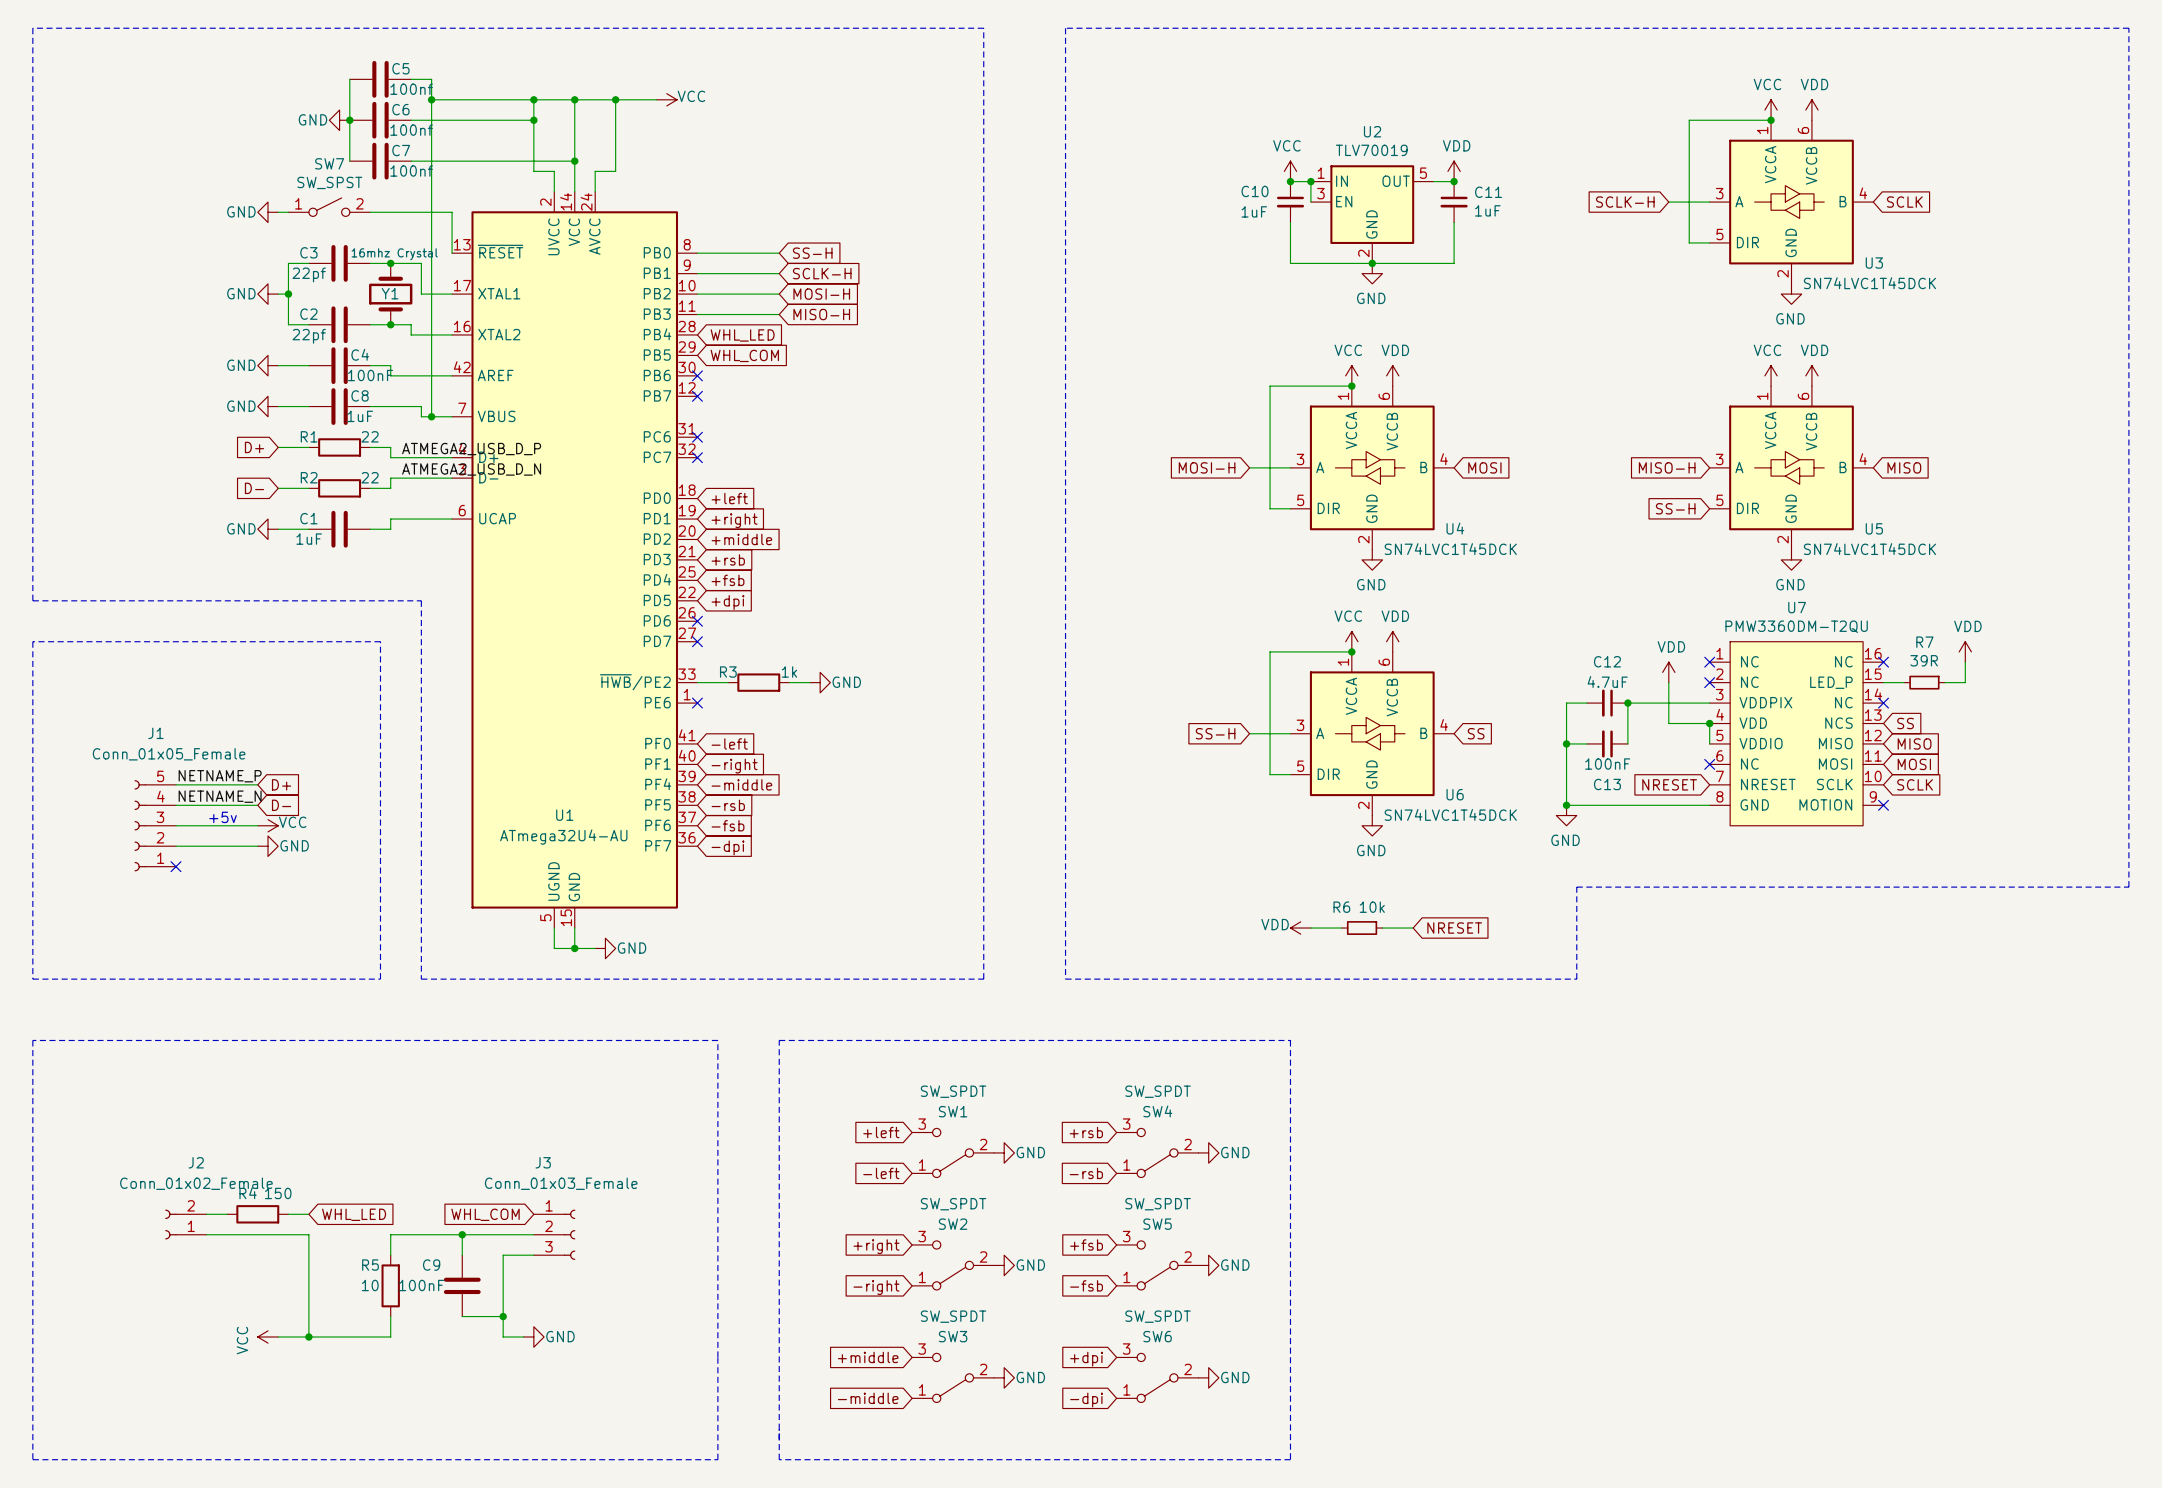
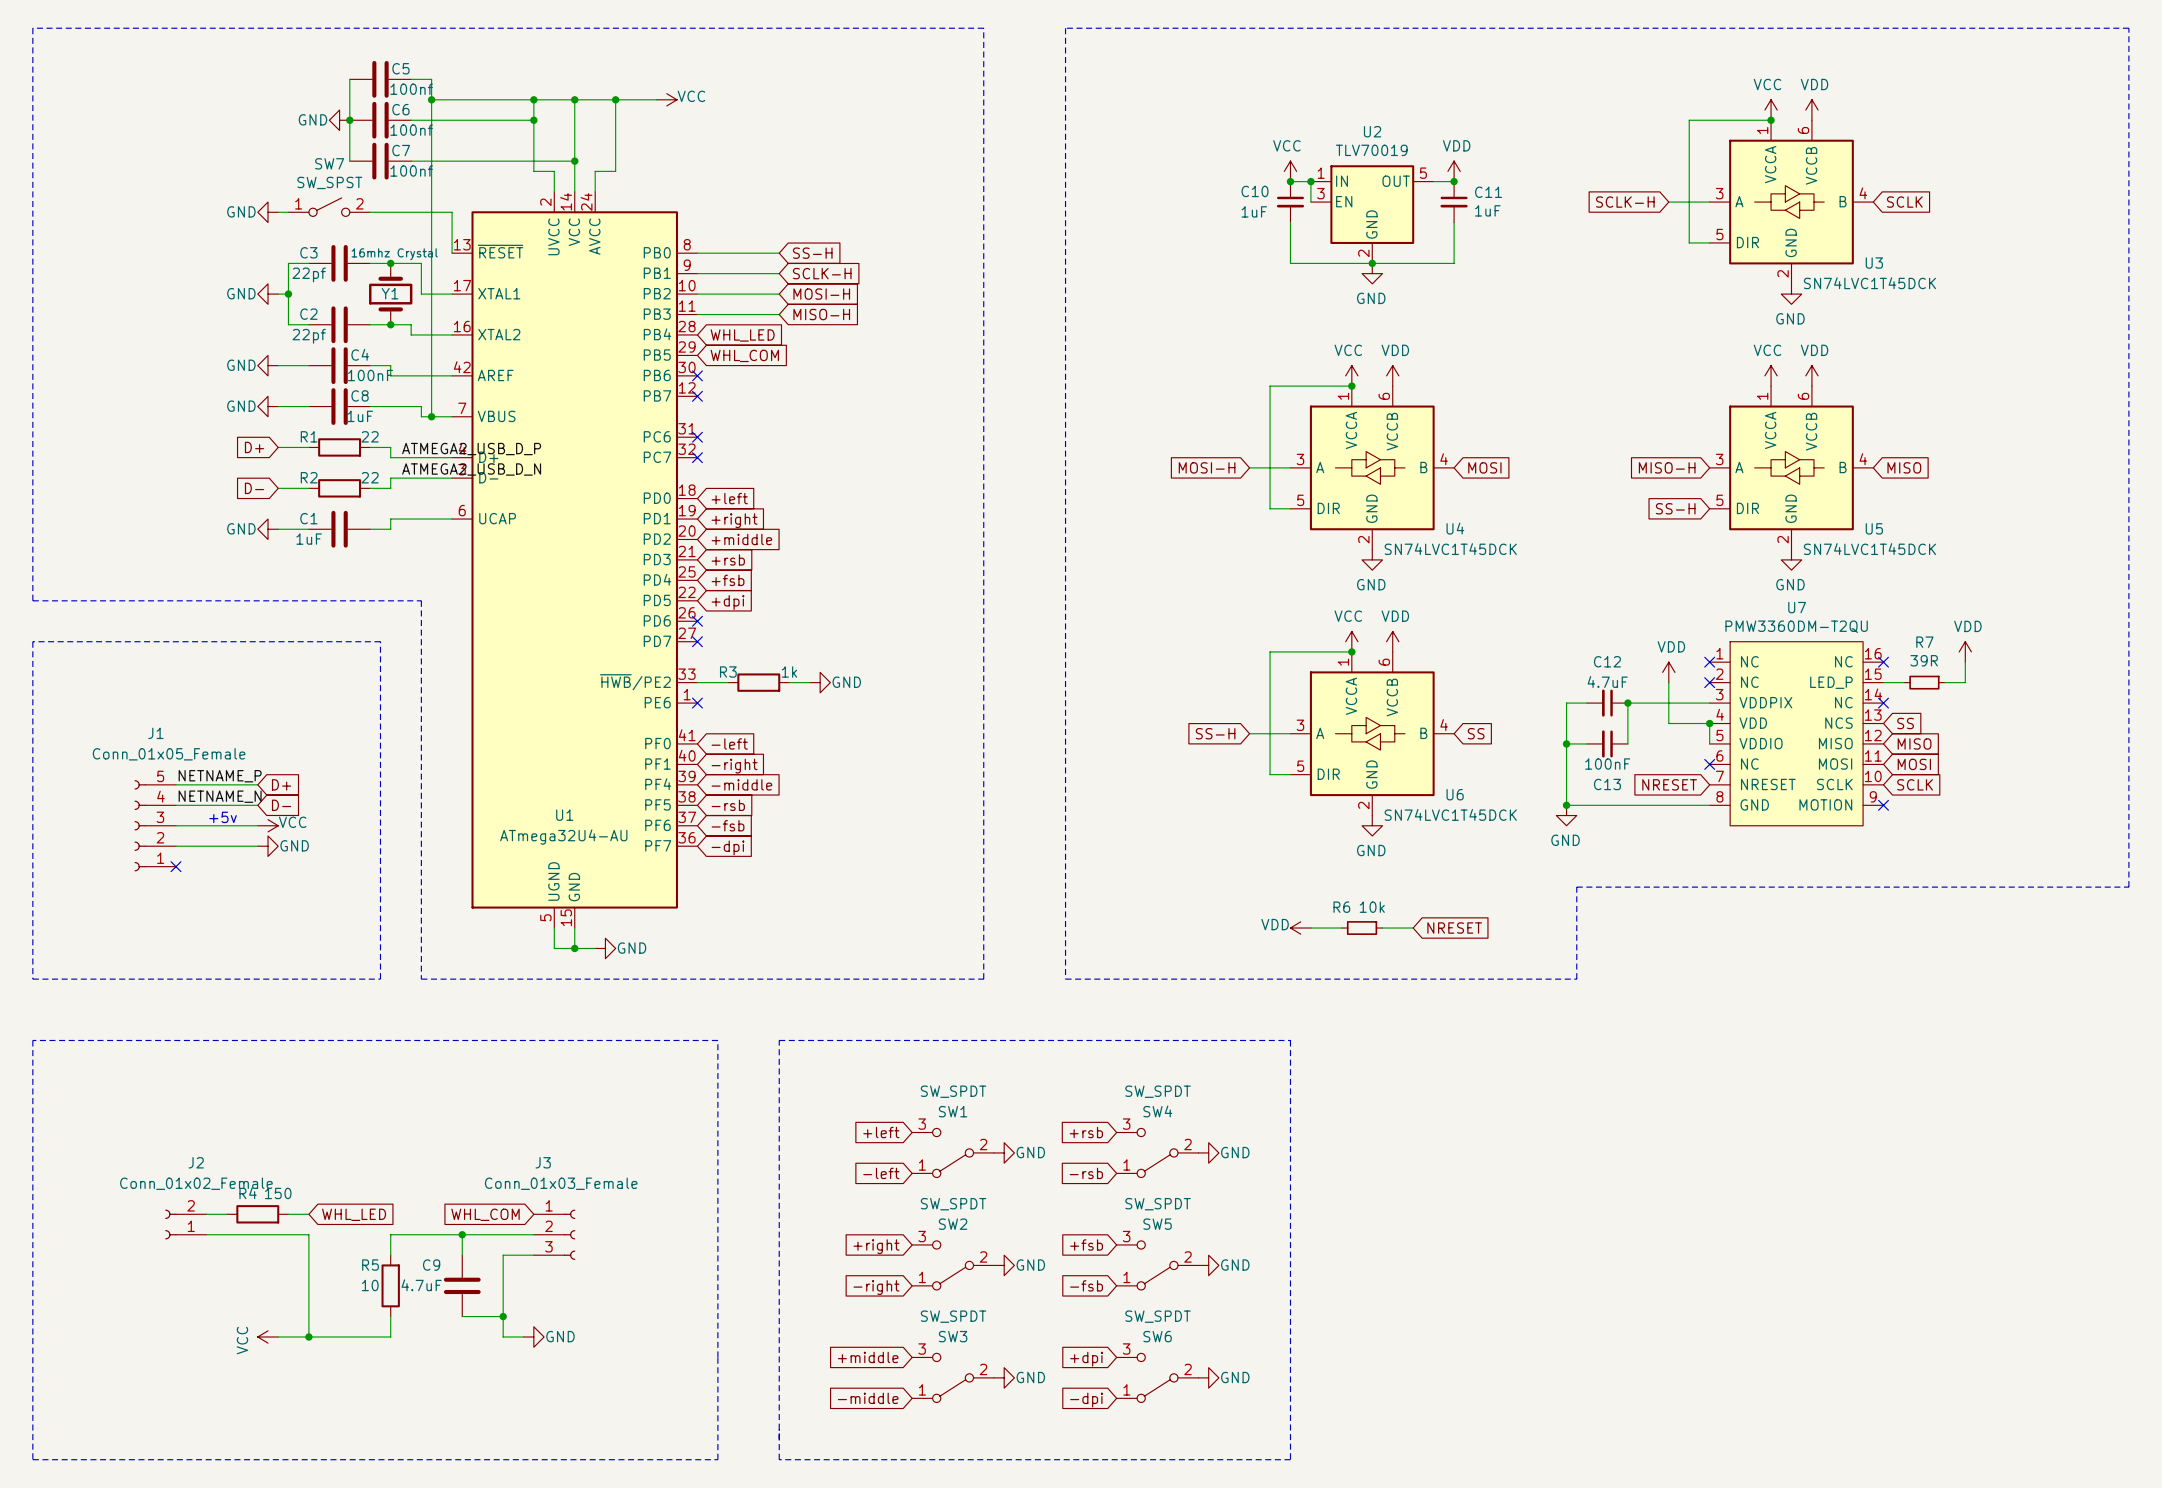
C9 value: 100nF (421, 1285) -> 4.7uF (421, 1285)

